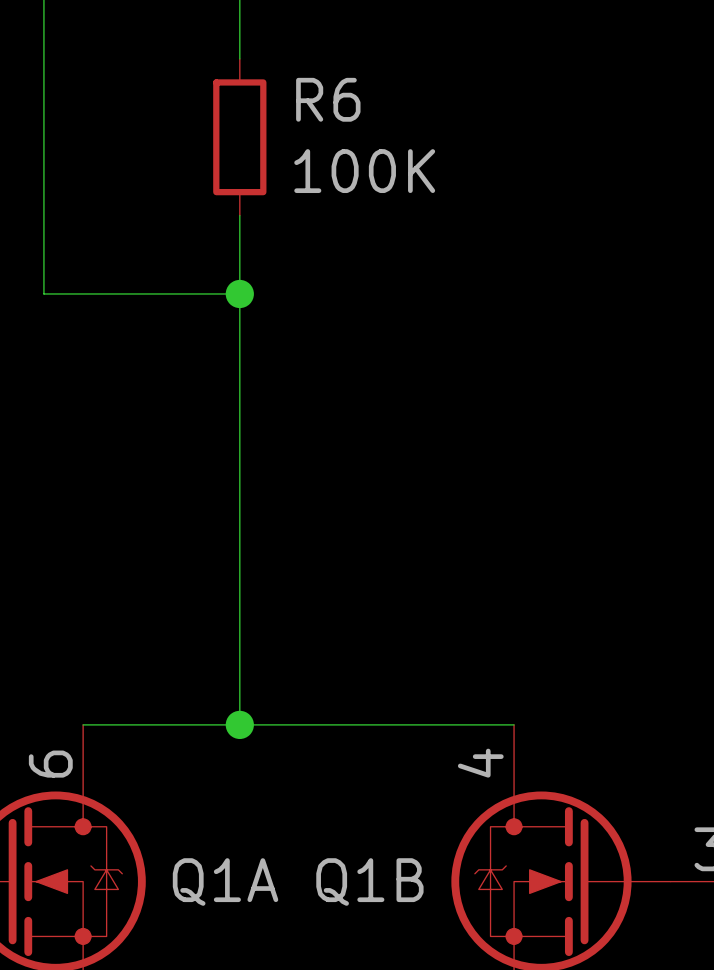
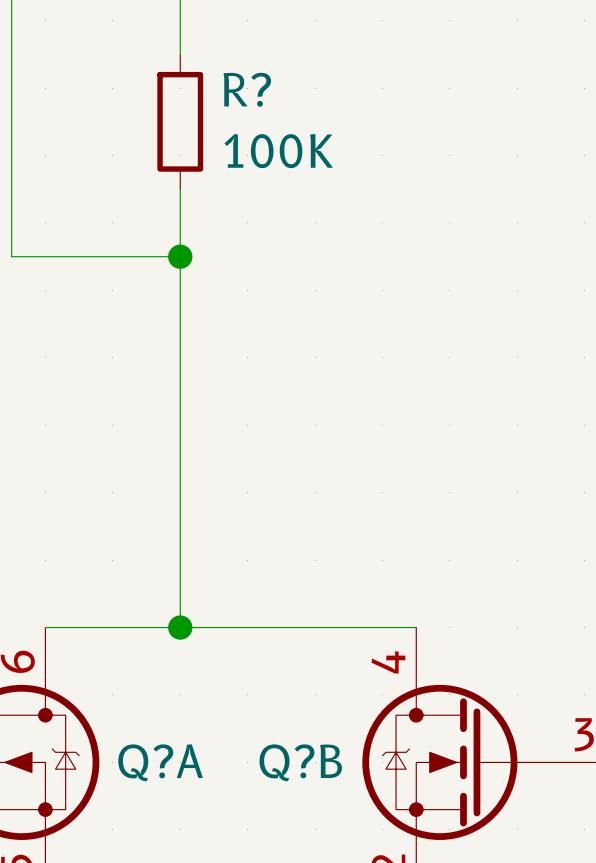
R6 name: R6 (328, 99) -> R? (247, 89)
Q1A name: Q1A (225, 882) -> Q?A (160, 762)
Q1B name: Q1B (369, 882) -> Q?B (300, 762)

